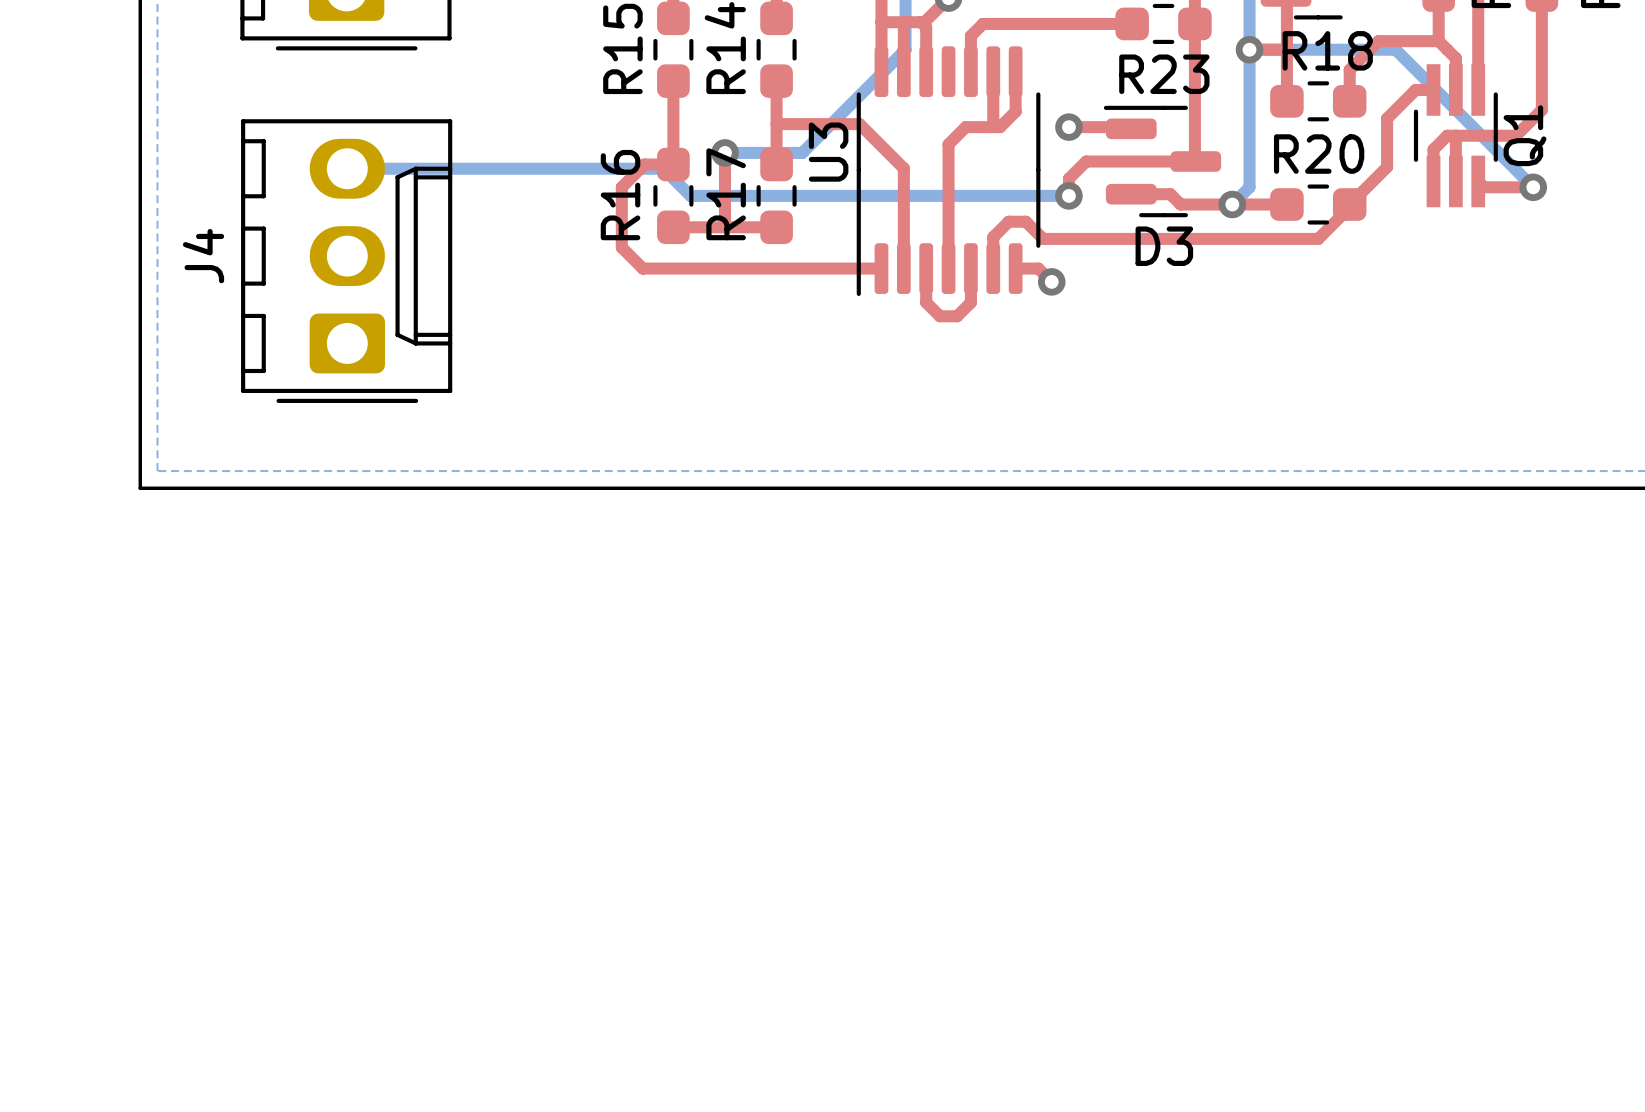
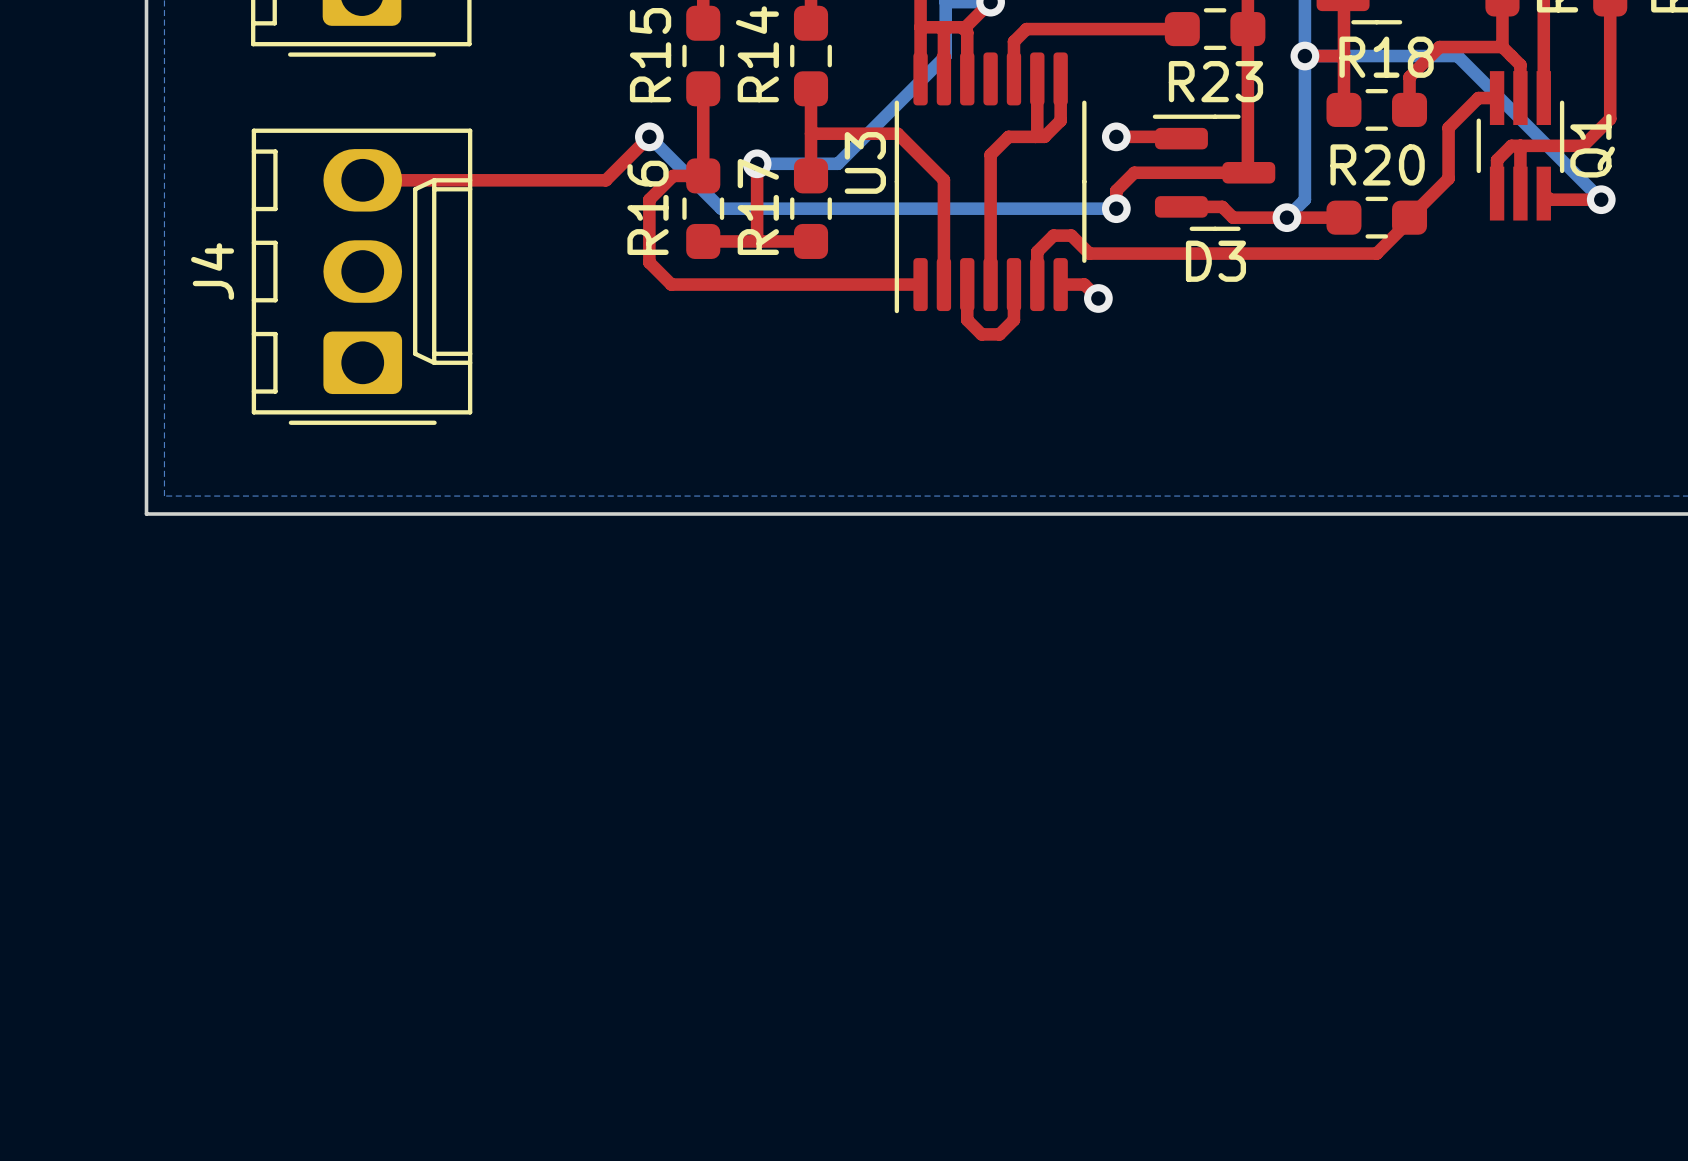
top track: none -> (649, 136) (605, 180) (362, 180)
via: none -> (649, 136)
bottom track: (347, 168) (663, 168) -> (649, 136) (692, 180)

